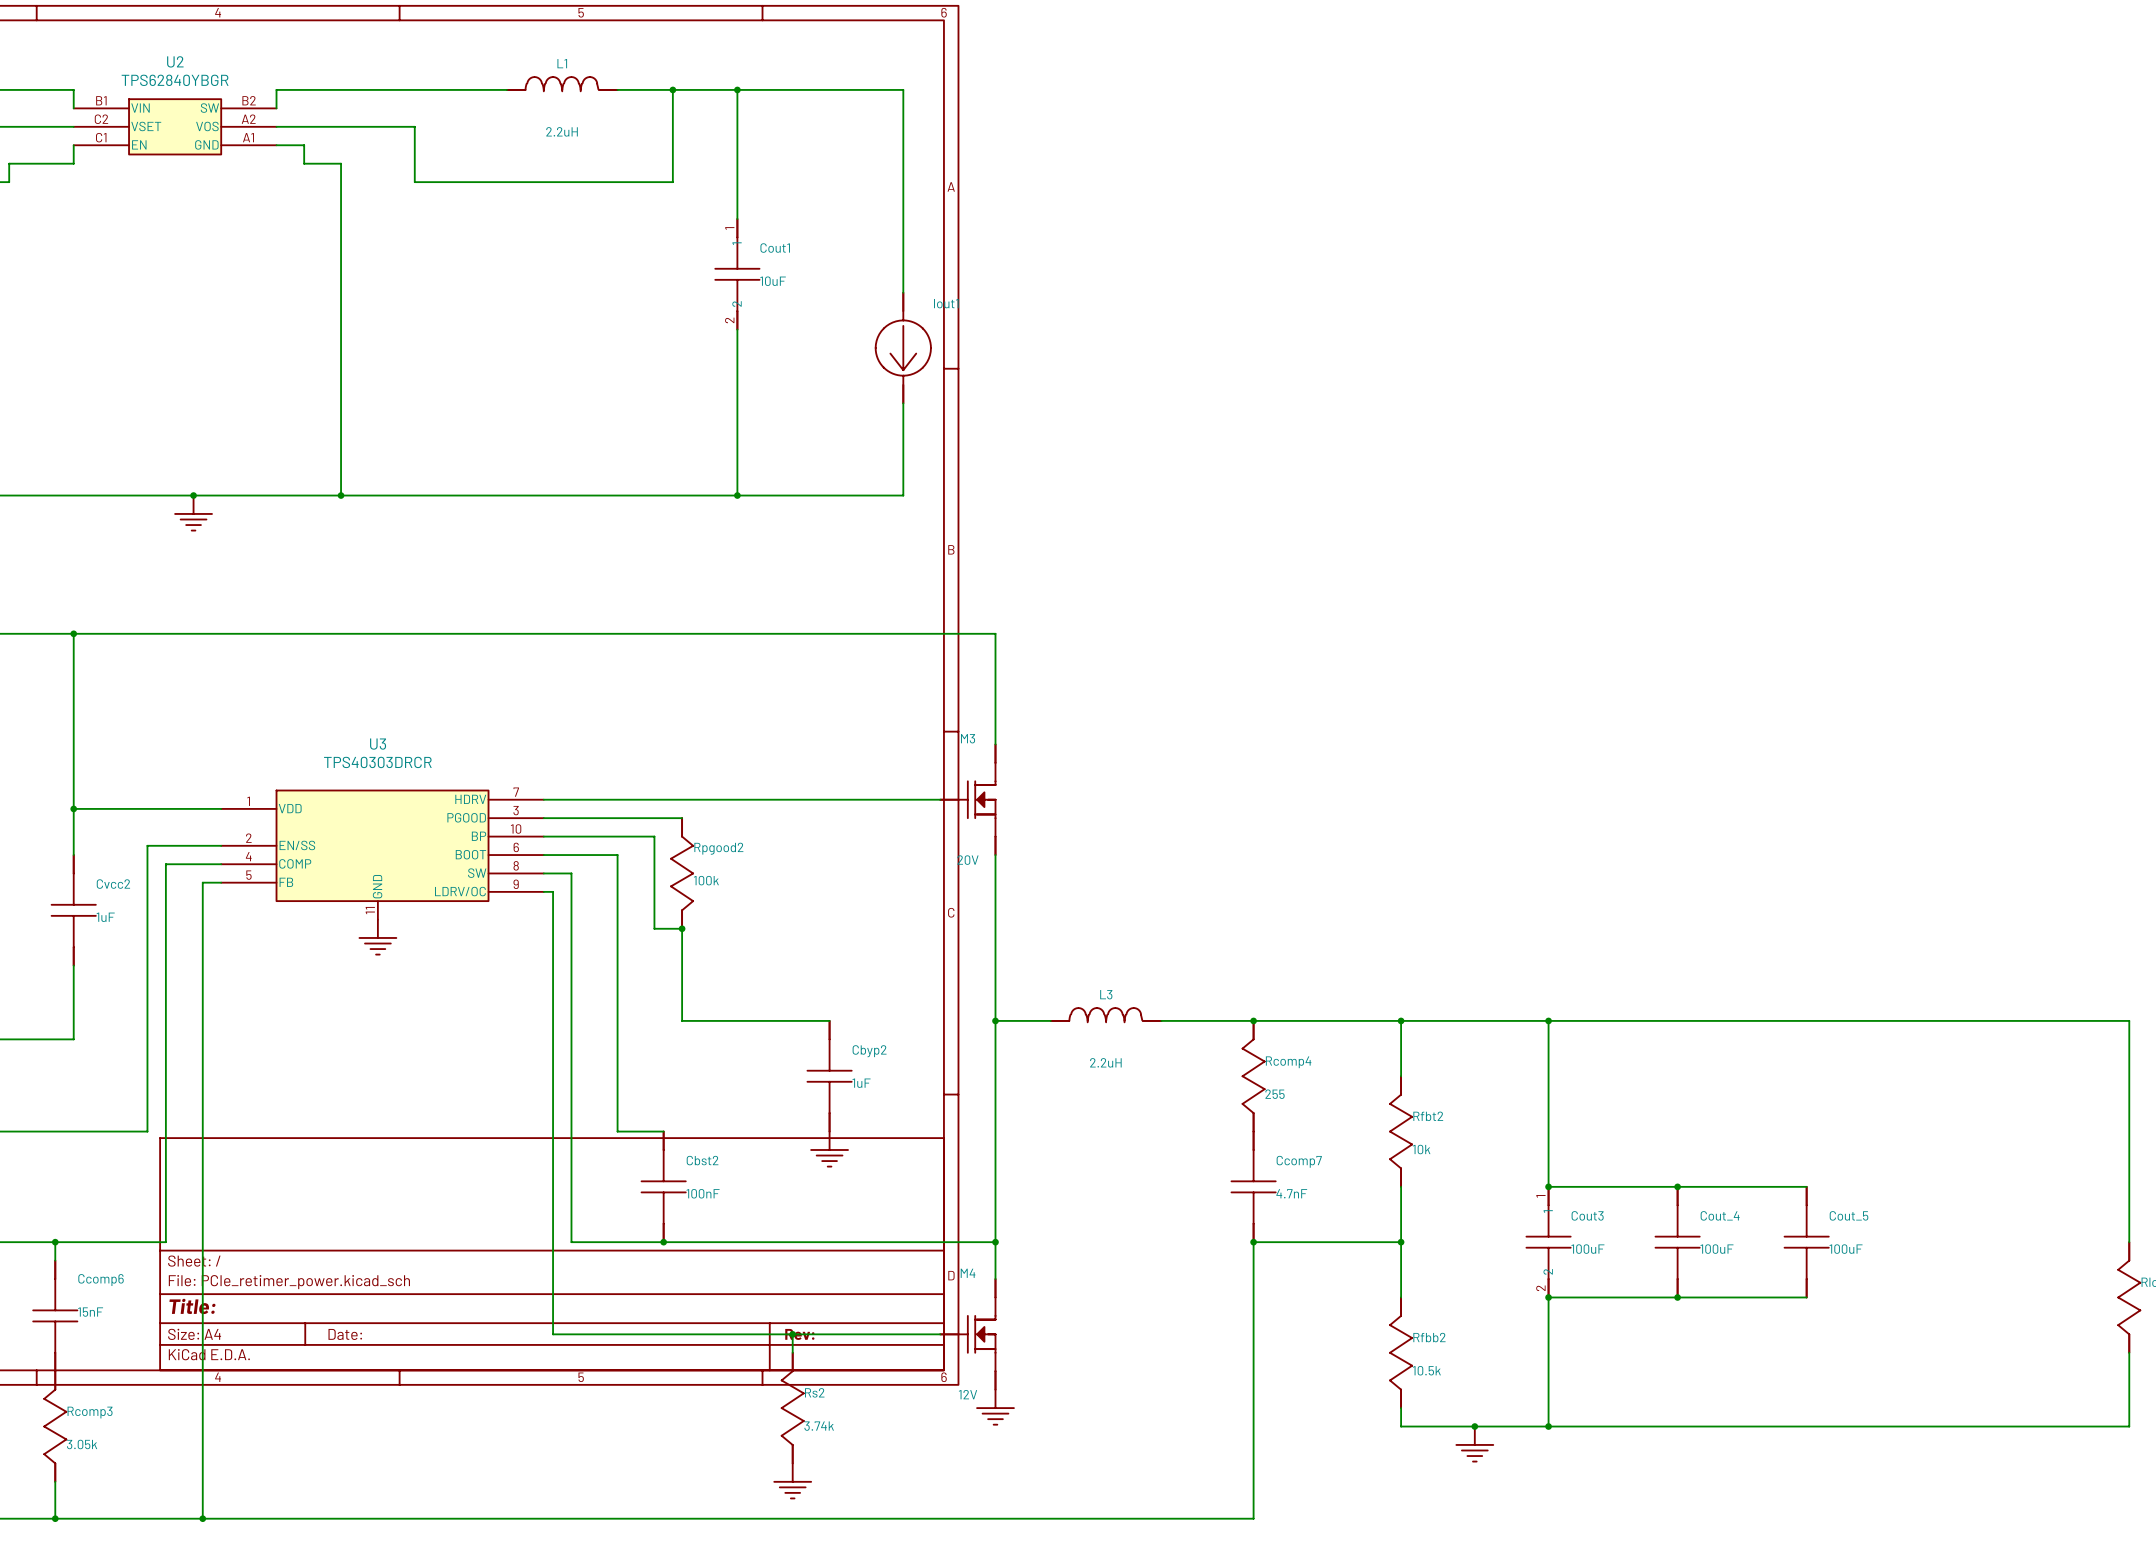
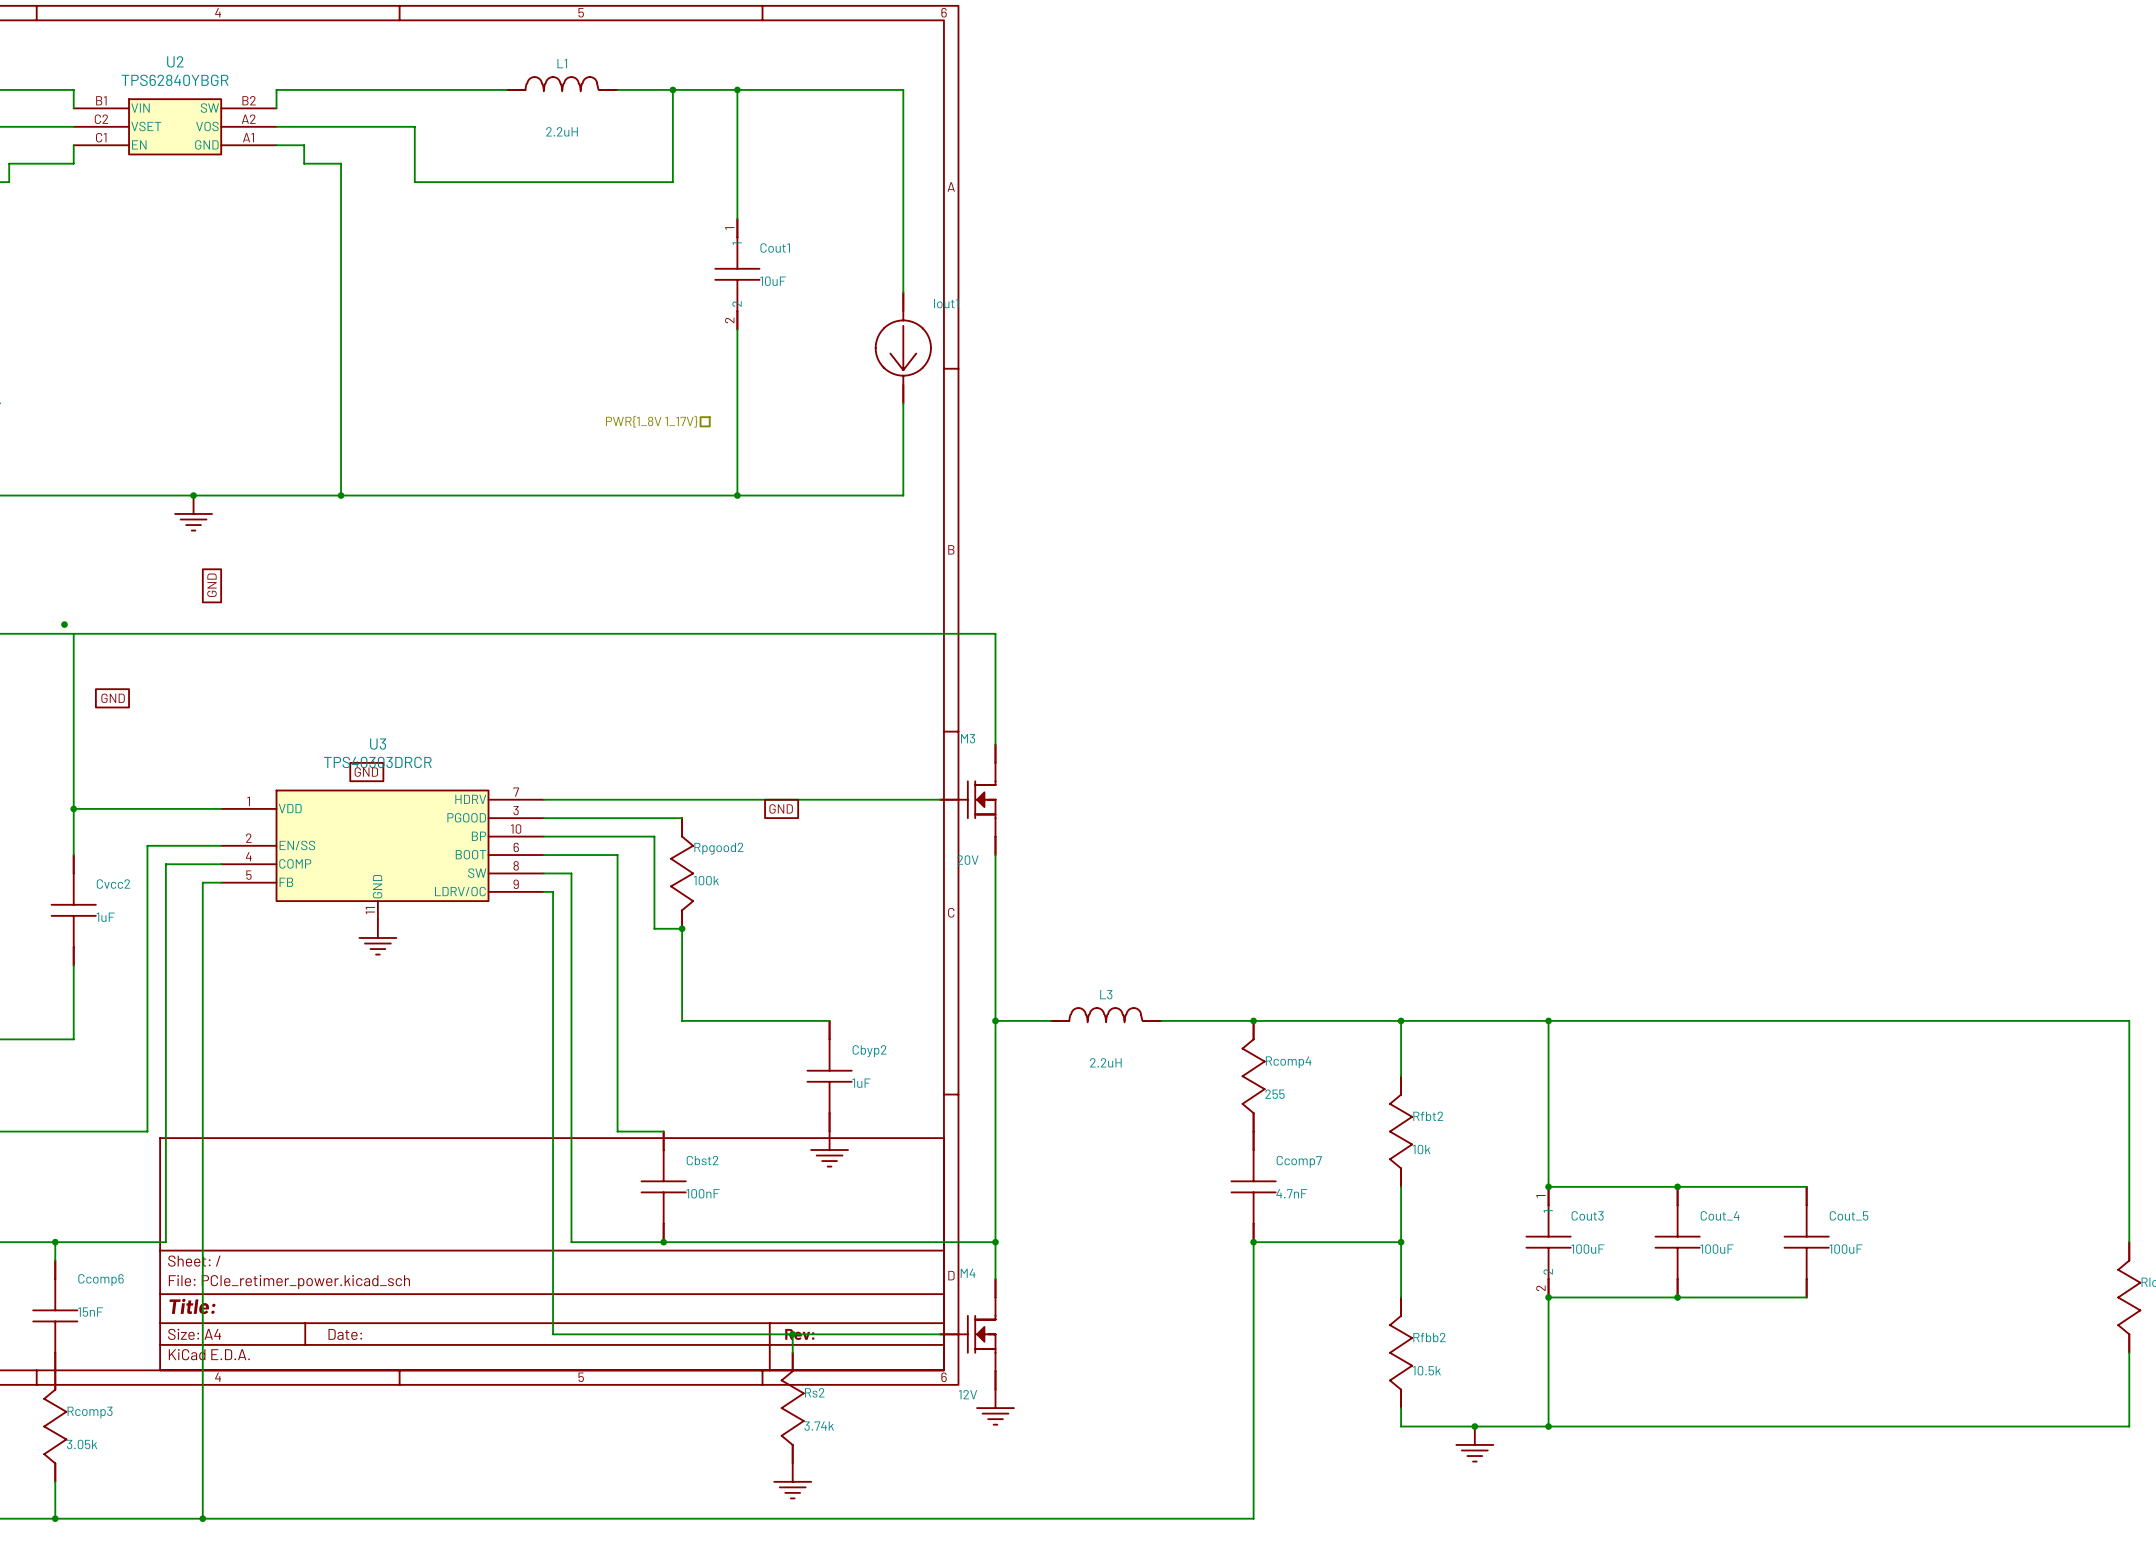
hierarchical label: none -> PWR{1_8V 1_17V} (651, 421)
global label: none -> GND (211, 585)
junction position: (73, 633) -> (64, 624)
global label: none -> GND (113, 698)
global label: none -> GND (366, 772)
global label: none -> GND (781, 808)

